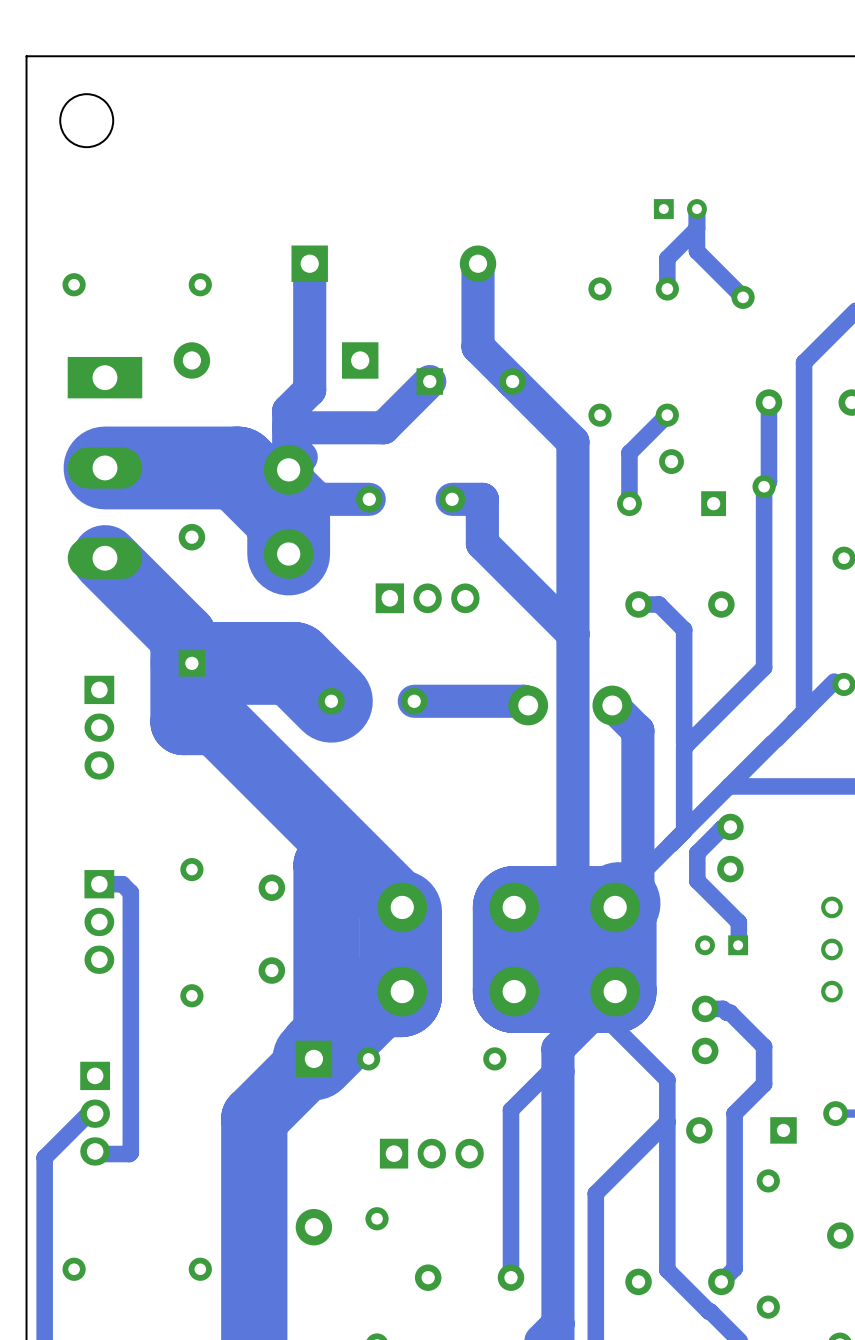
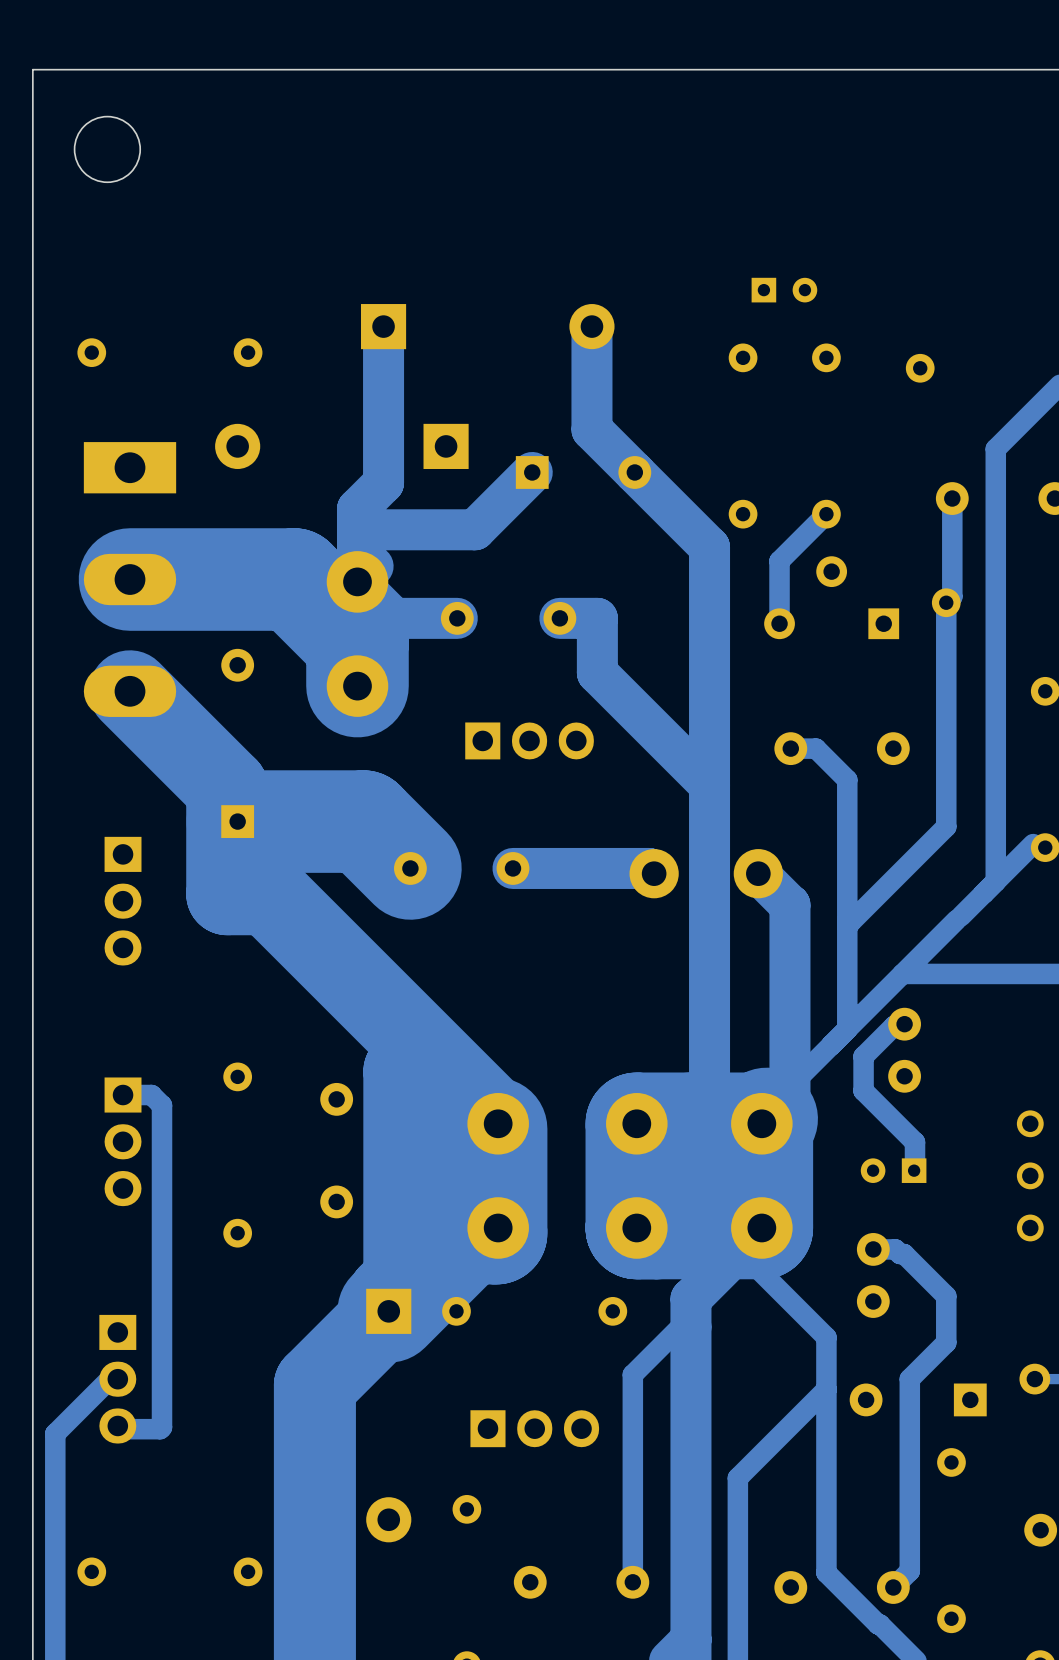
part position: (680, 209) -> (784, 290)
track: (696, 209) (696, 251) (743, 297) -> none
track: (696, 228) (667, 258) (667, 288) -> none

